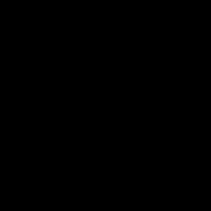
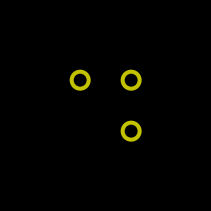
part: none -> (80, 80)
part: none -> (131, 80)
part: none -> (131, 131)

